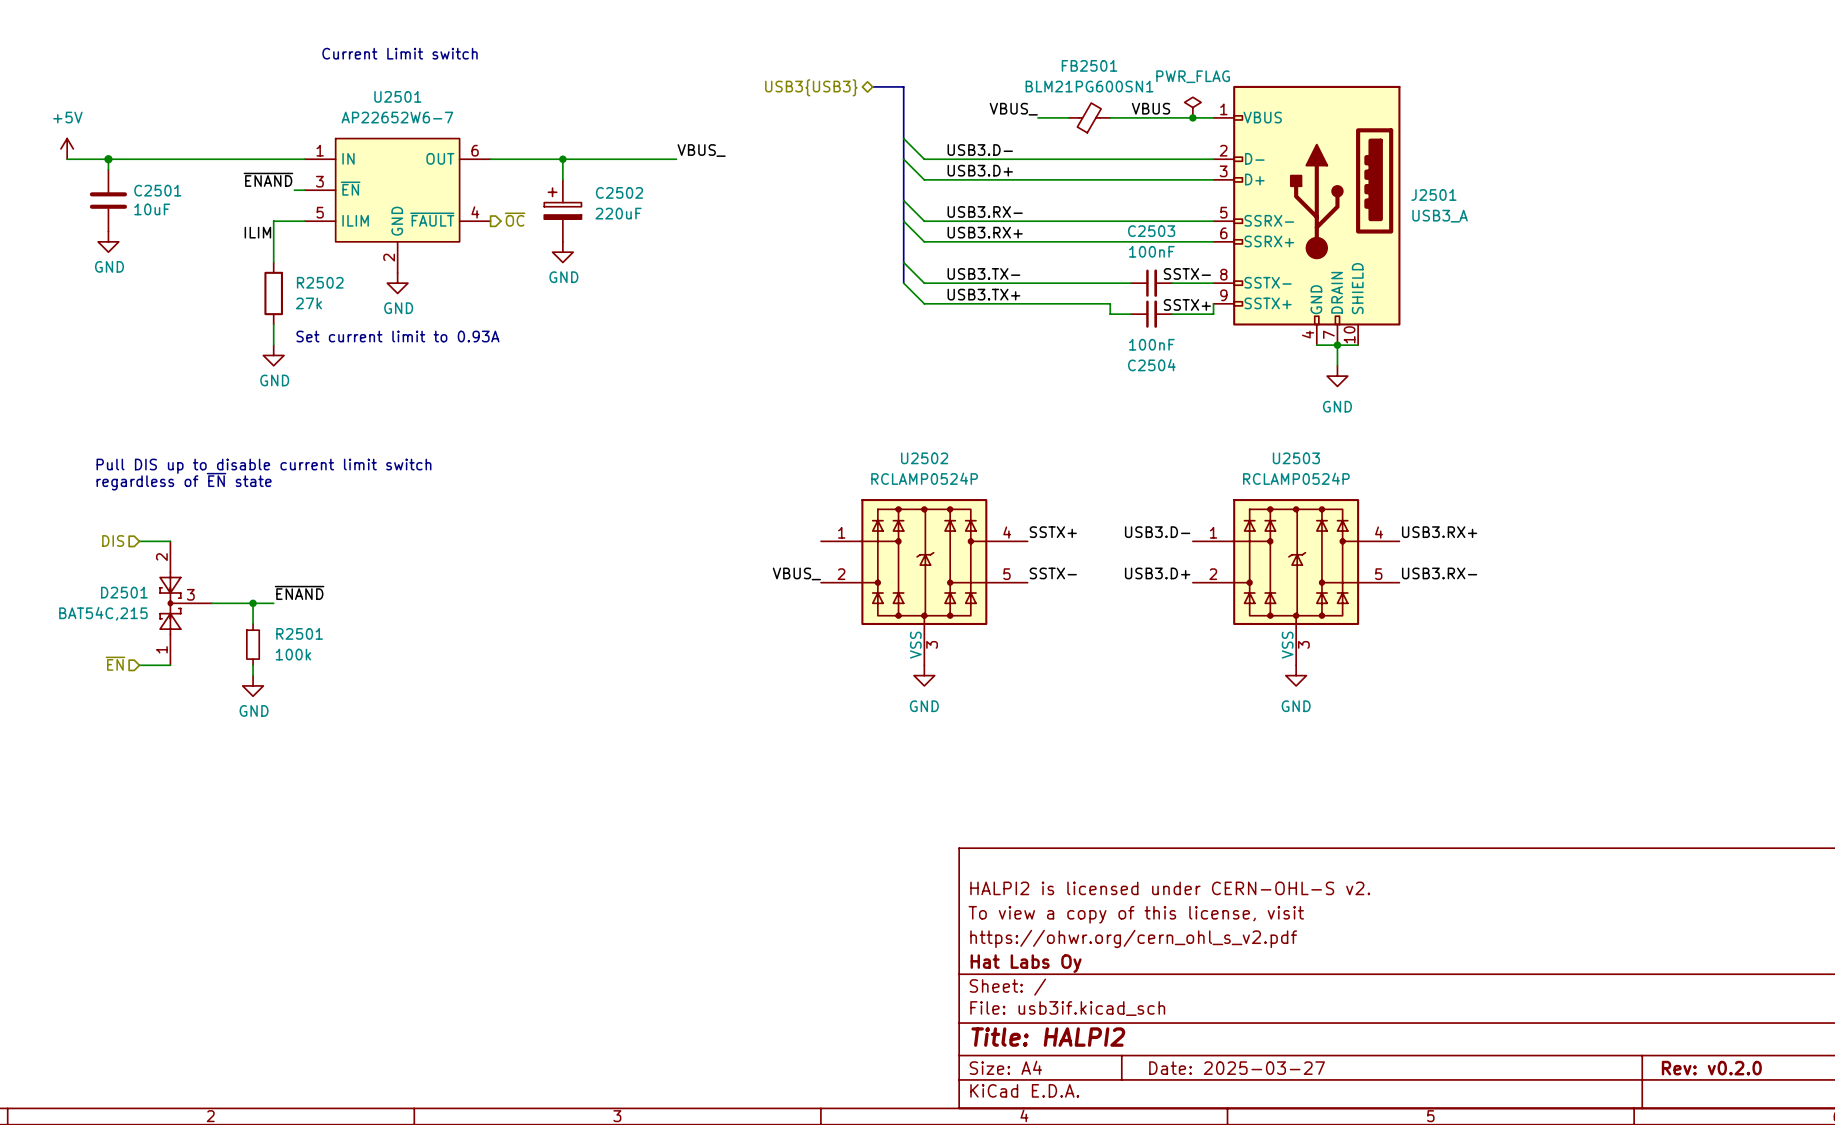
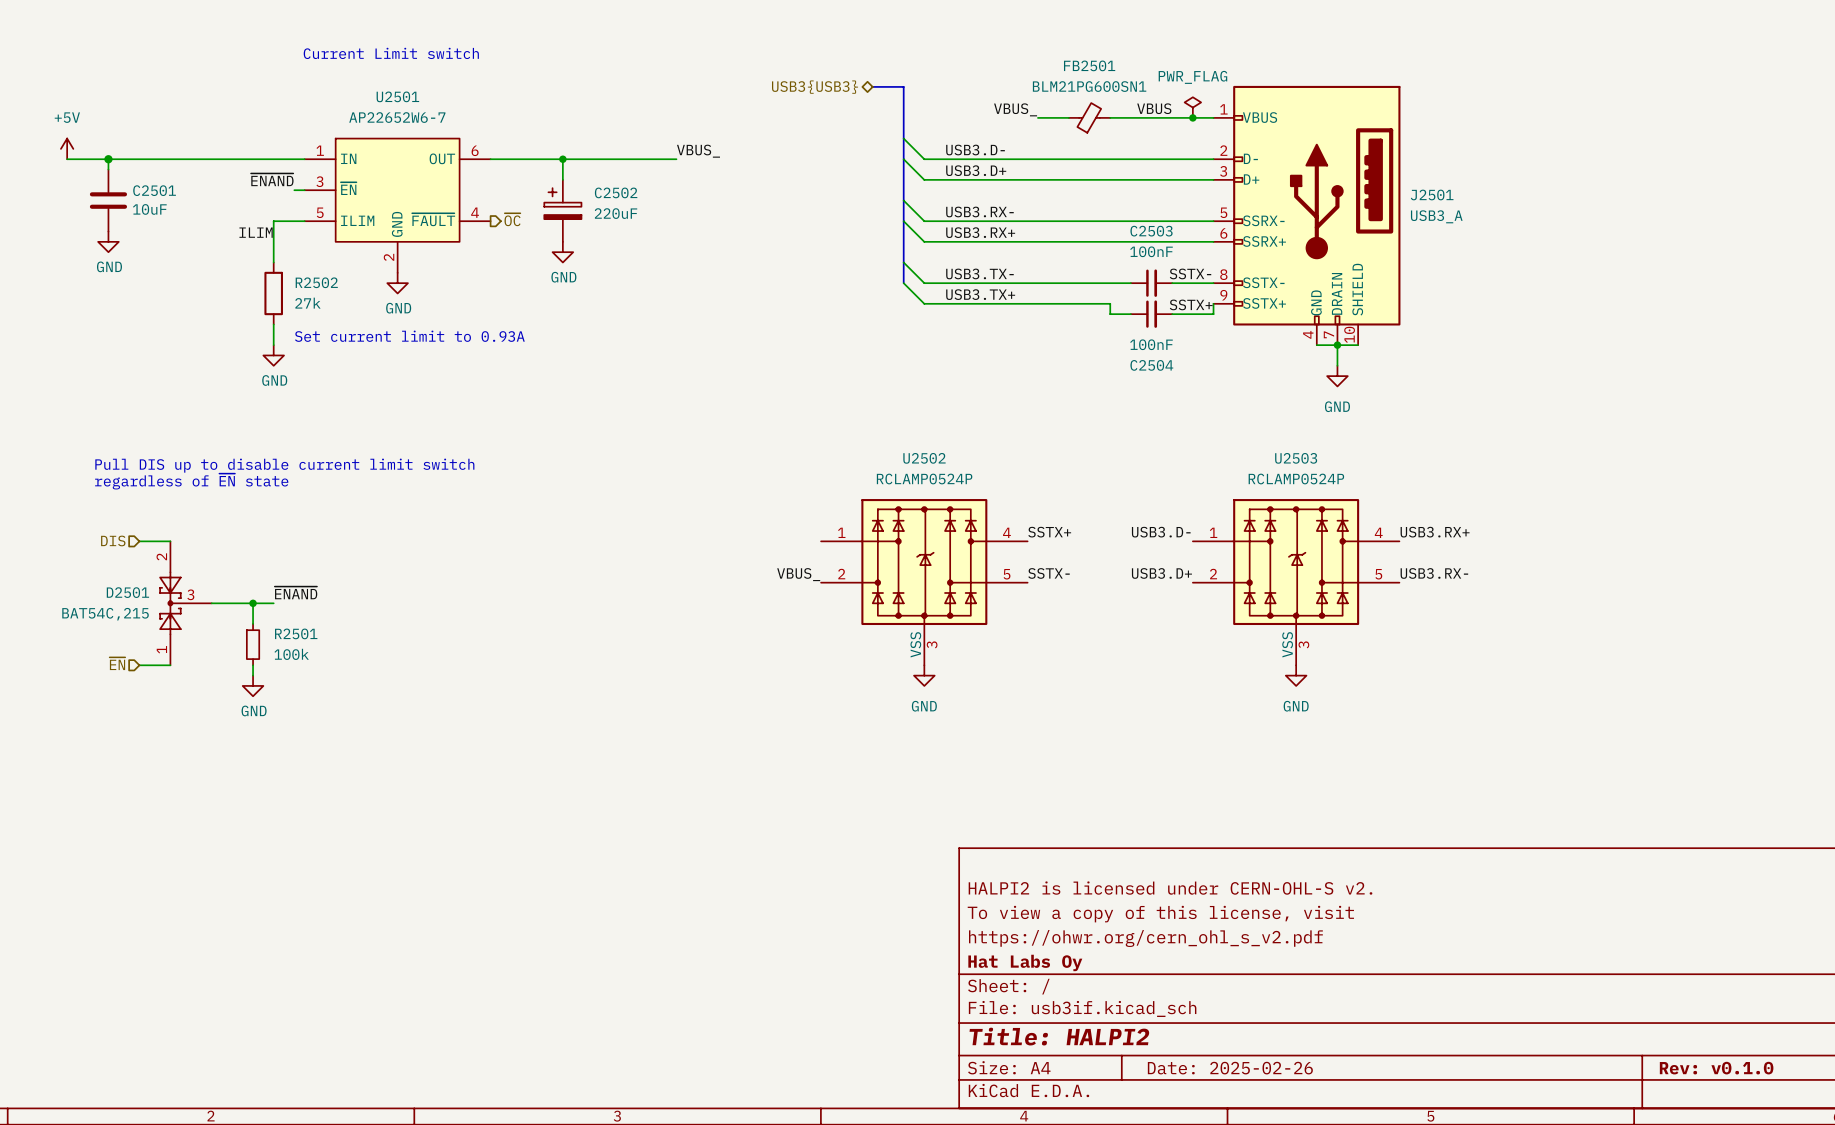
title block: Date: 2025-03-27 (1237, 1068) -> Date: 2025-02-26 (1230, 1068)
title block: Rev: v0.2.0 (1711, 1068) -> Rev: v0.1.0 (1716, 1068)

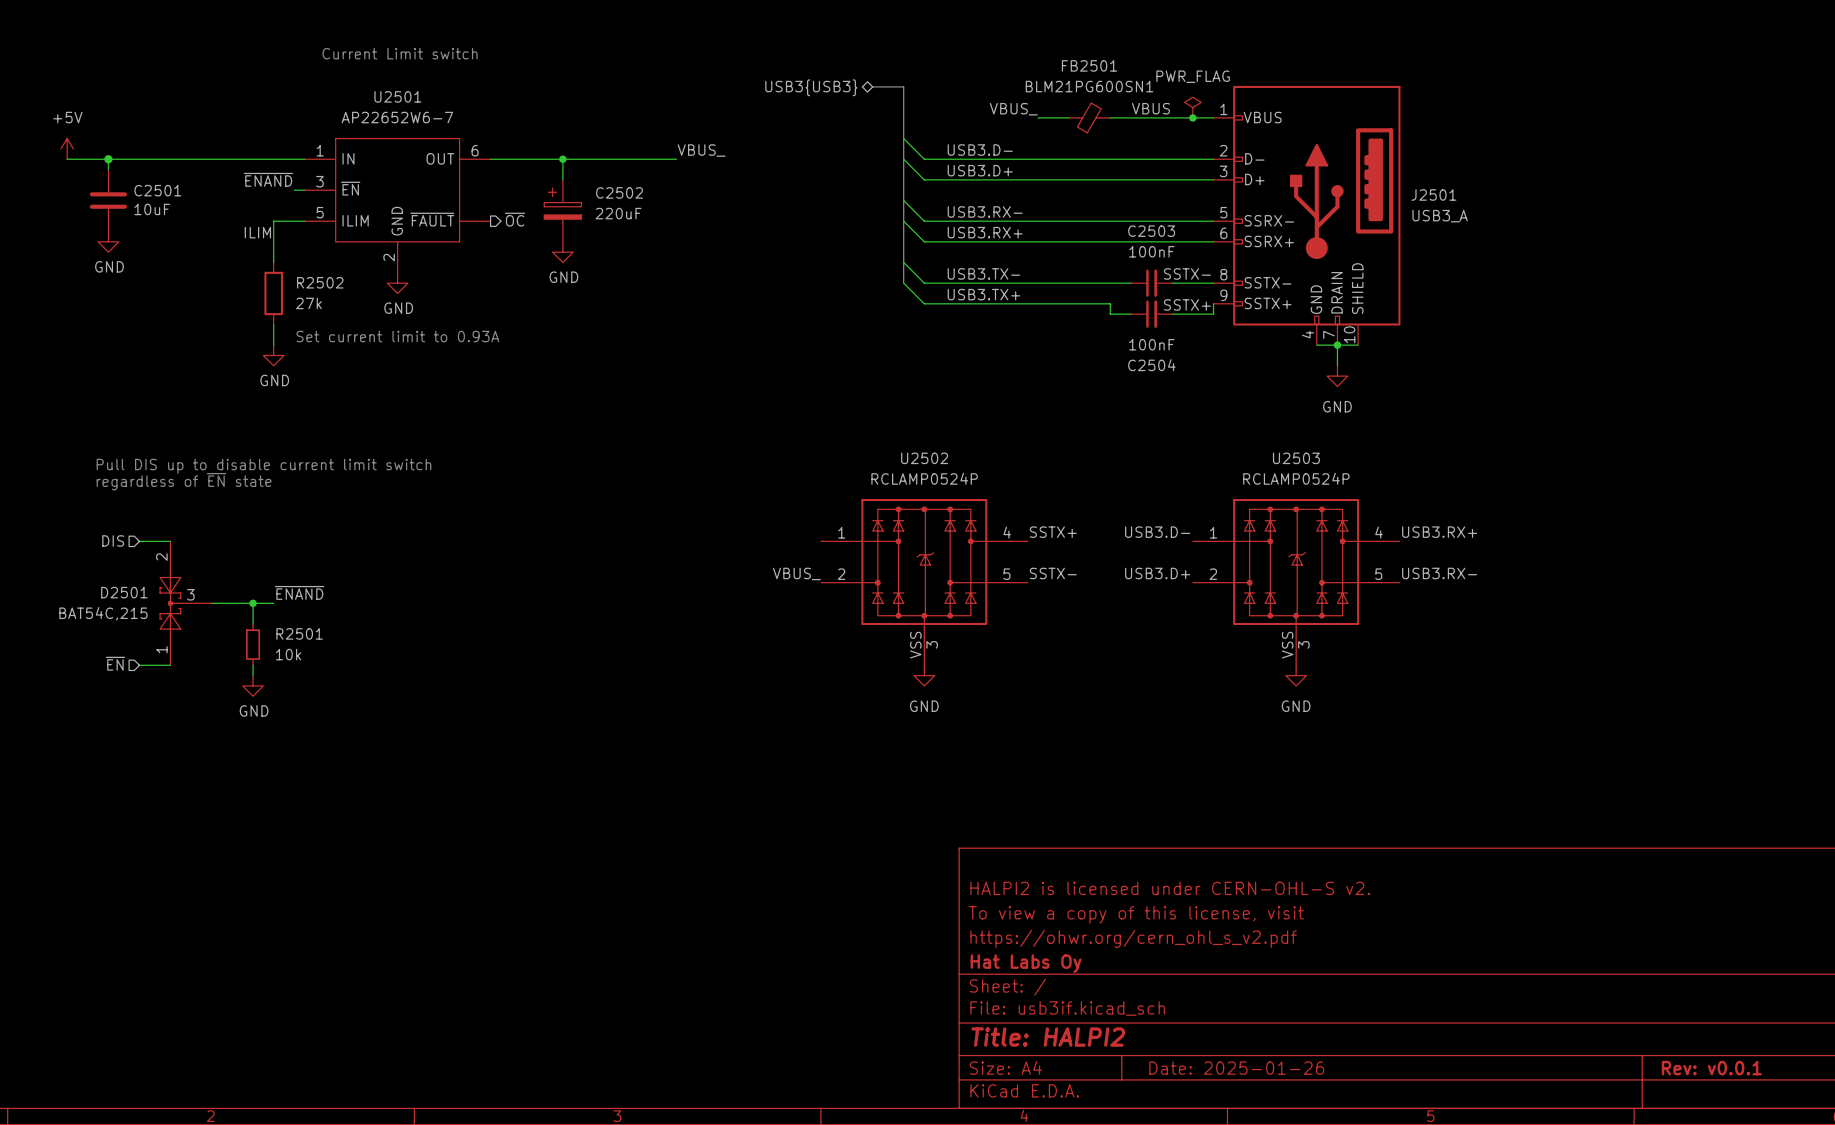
U2501 pin number: 4 (475, 212) -> none
R2501 value: 100k (291, 654) -> 10k (288, 654)
title block: Date: 2025-02-26 (1230, 1068) -> Date: 2025-01-26 (1236, 1068)
title block: Rev: v0.1.0 (1716, 1068) -> Rev: v0.0.1 (1711, 1068)

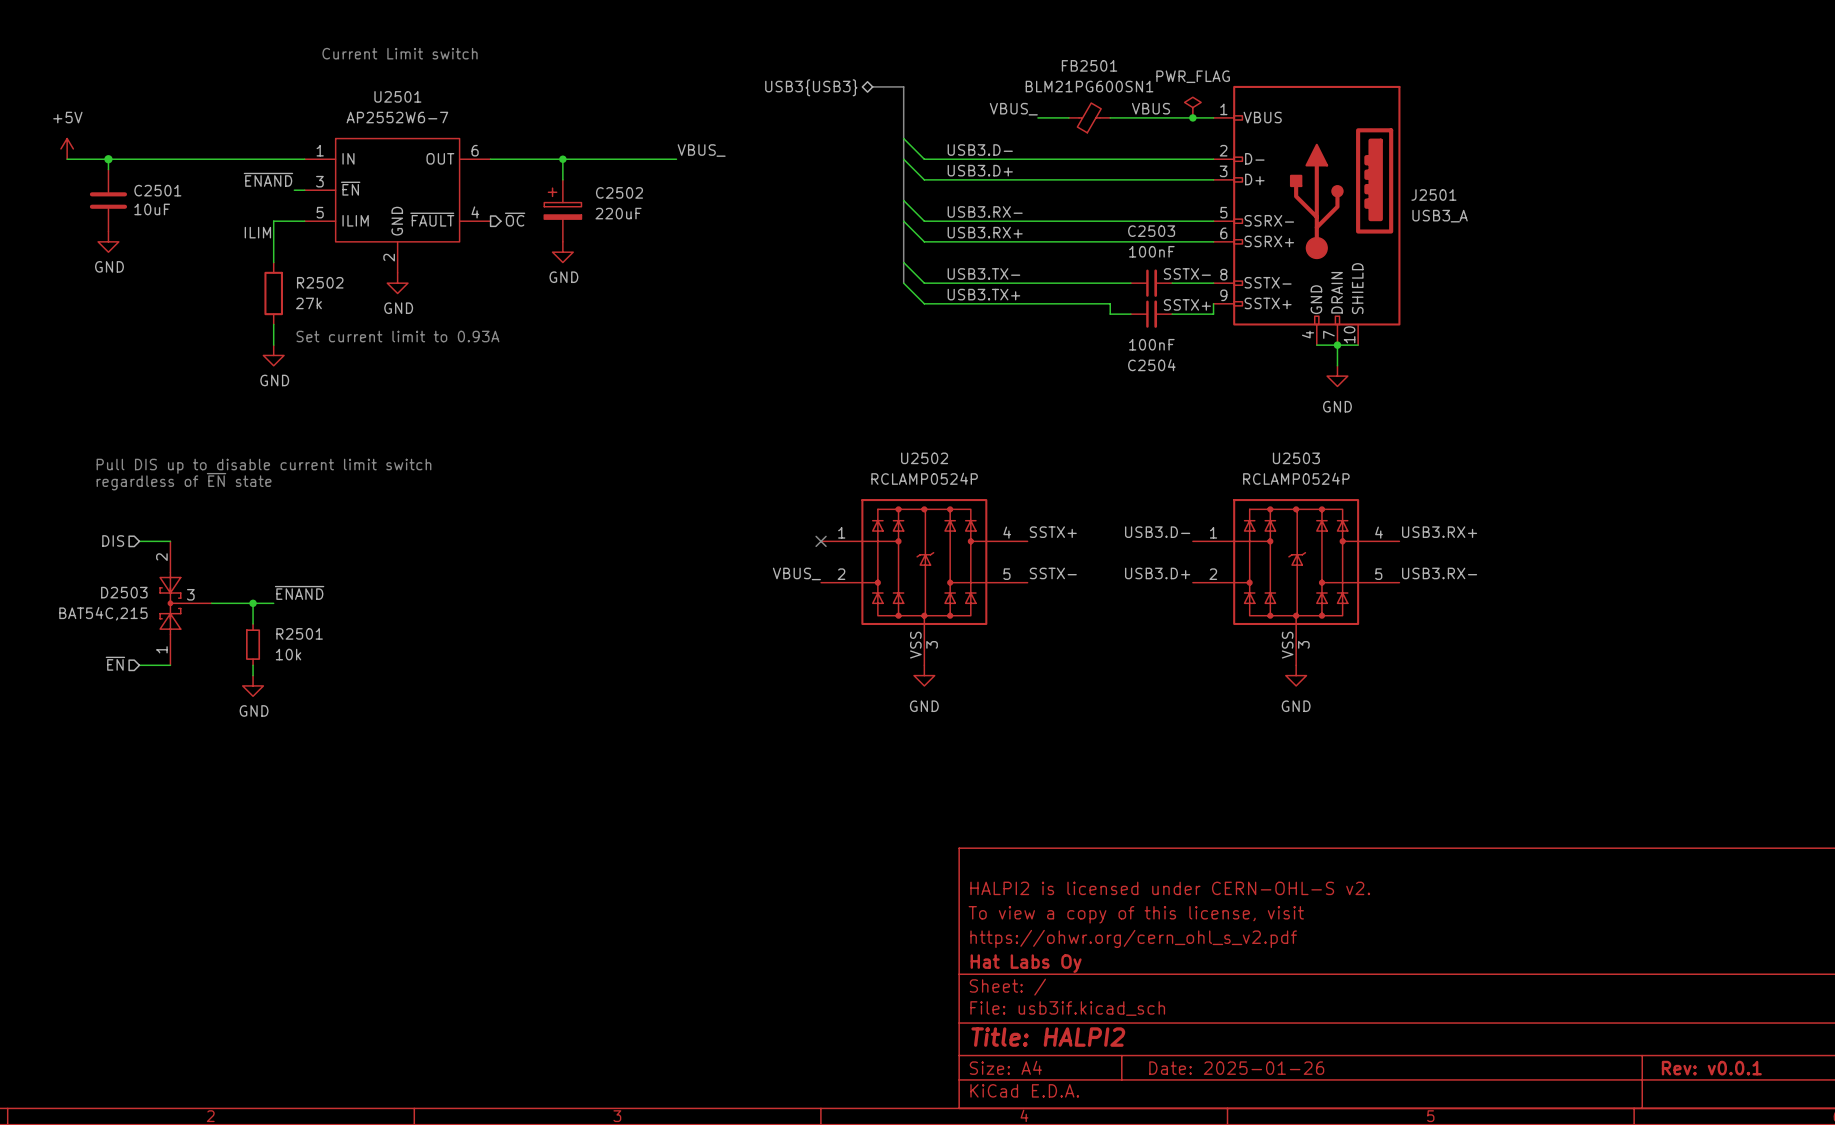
U2501 value: AP22652W6-7 (397, 117) -> AP2552W6-7 (397, 117)
U2501 pin number: none -> 4 (475, 212)
no-connect mark: none -> (821, 541)
D2501 name: D2501 (124, 592) -> D2503 (124, 592)

